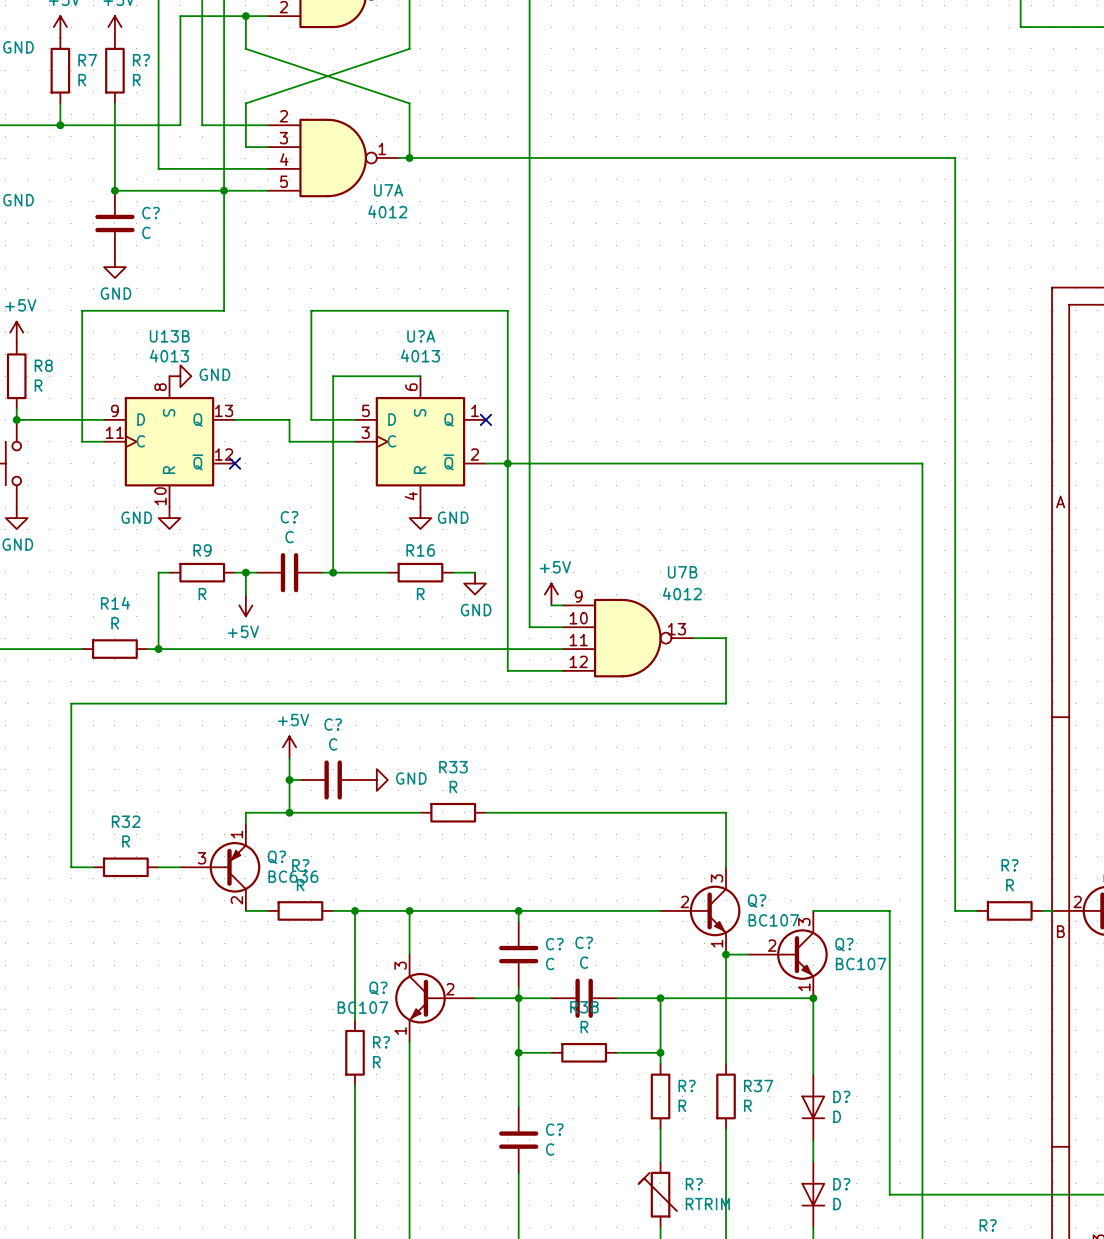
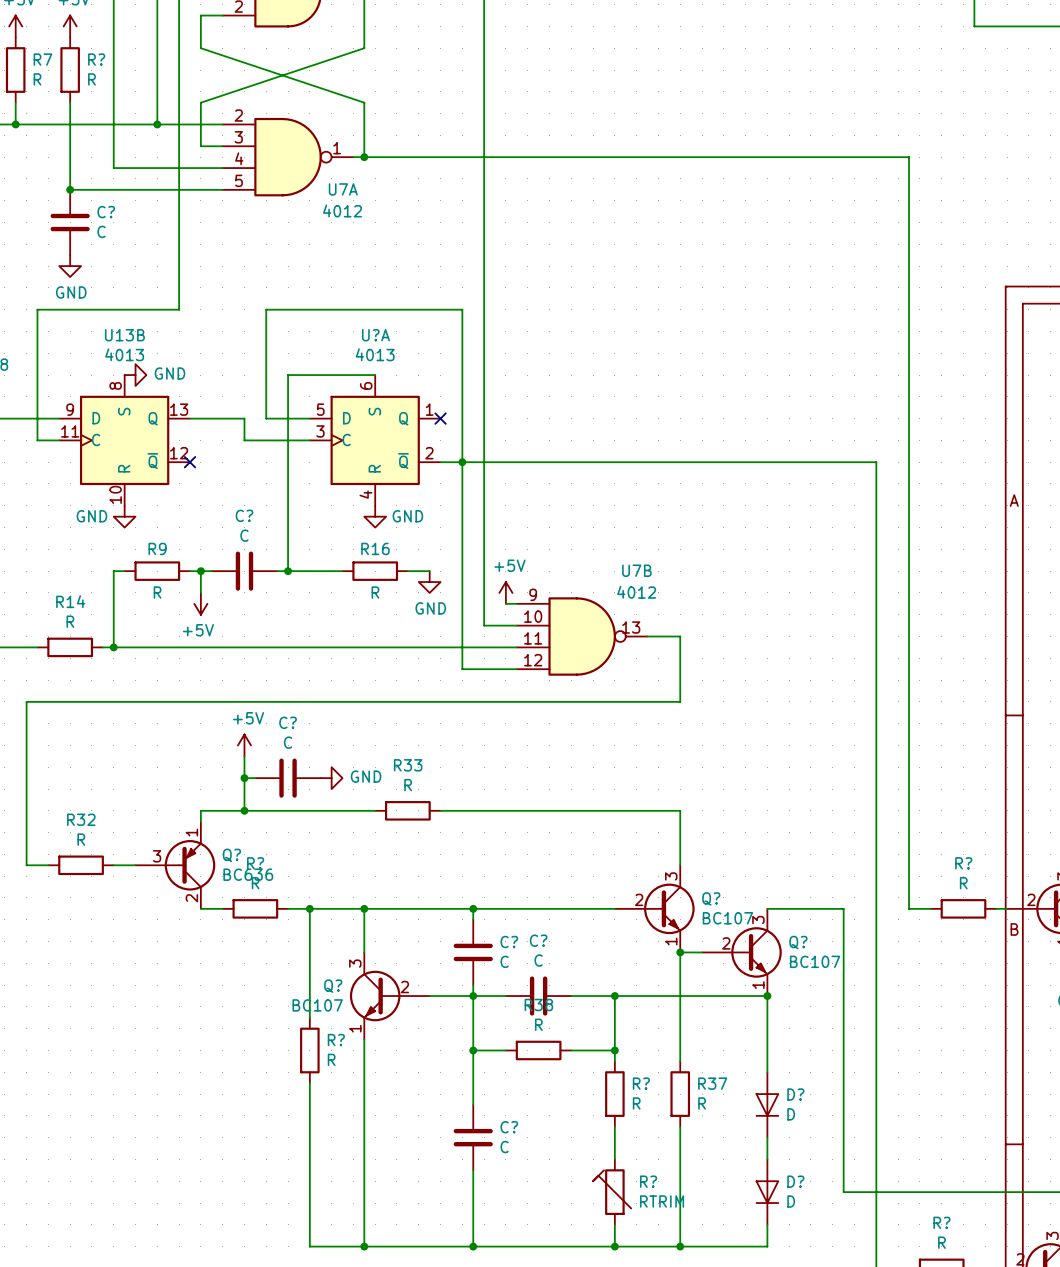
wire: (245, 16) (180, 16) (180, 125) -> (157, 124) (135, 124)
junction: (245, 16) -> none
junction: none -> (157, 124)
junction: (224, 190) -> none

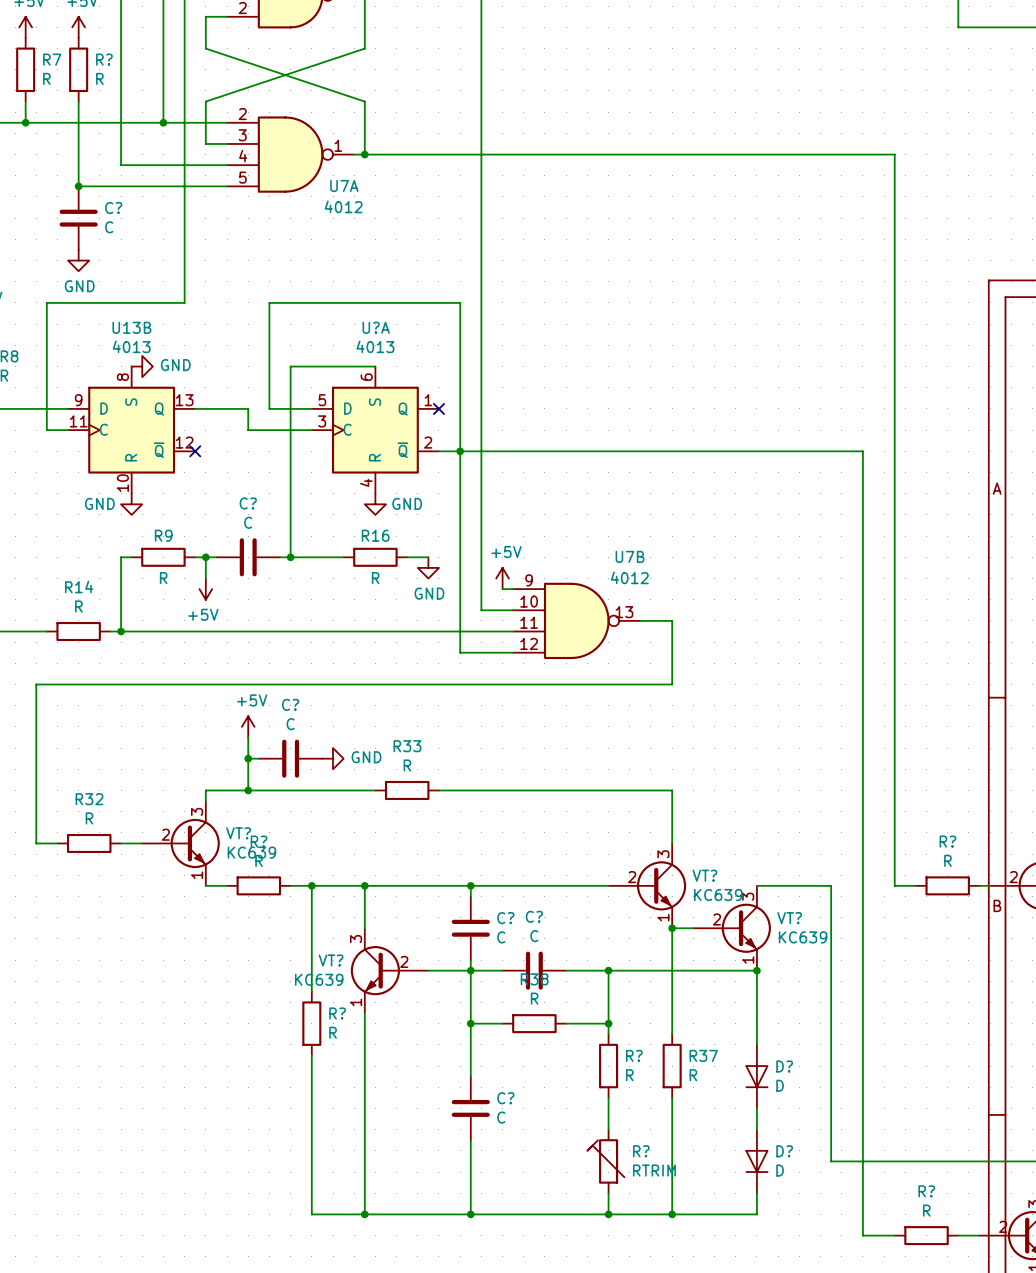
Q?: BC636 (175, 865) -> none
VT?: none -> KC639 (181, 843)
Q? name: Q? (711, 898) -> VT? (704, 875)
Q? value: BC107 (727, 918) -> KC639 (718, 895)
Q? name: Q? (798, 942) -> VT? (789, 918)
Q? value: BC107 (815, 961) -> KC639 (803, 937)
Q? name: Q? (333, 986) -> VT? (331, 960)
Q? value: BC107 (317, 1005) -> KC639 (319, 979)

